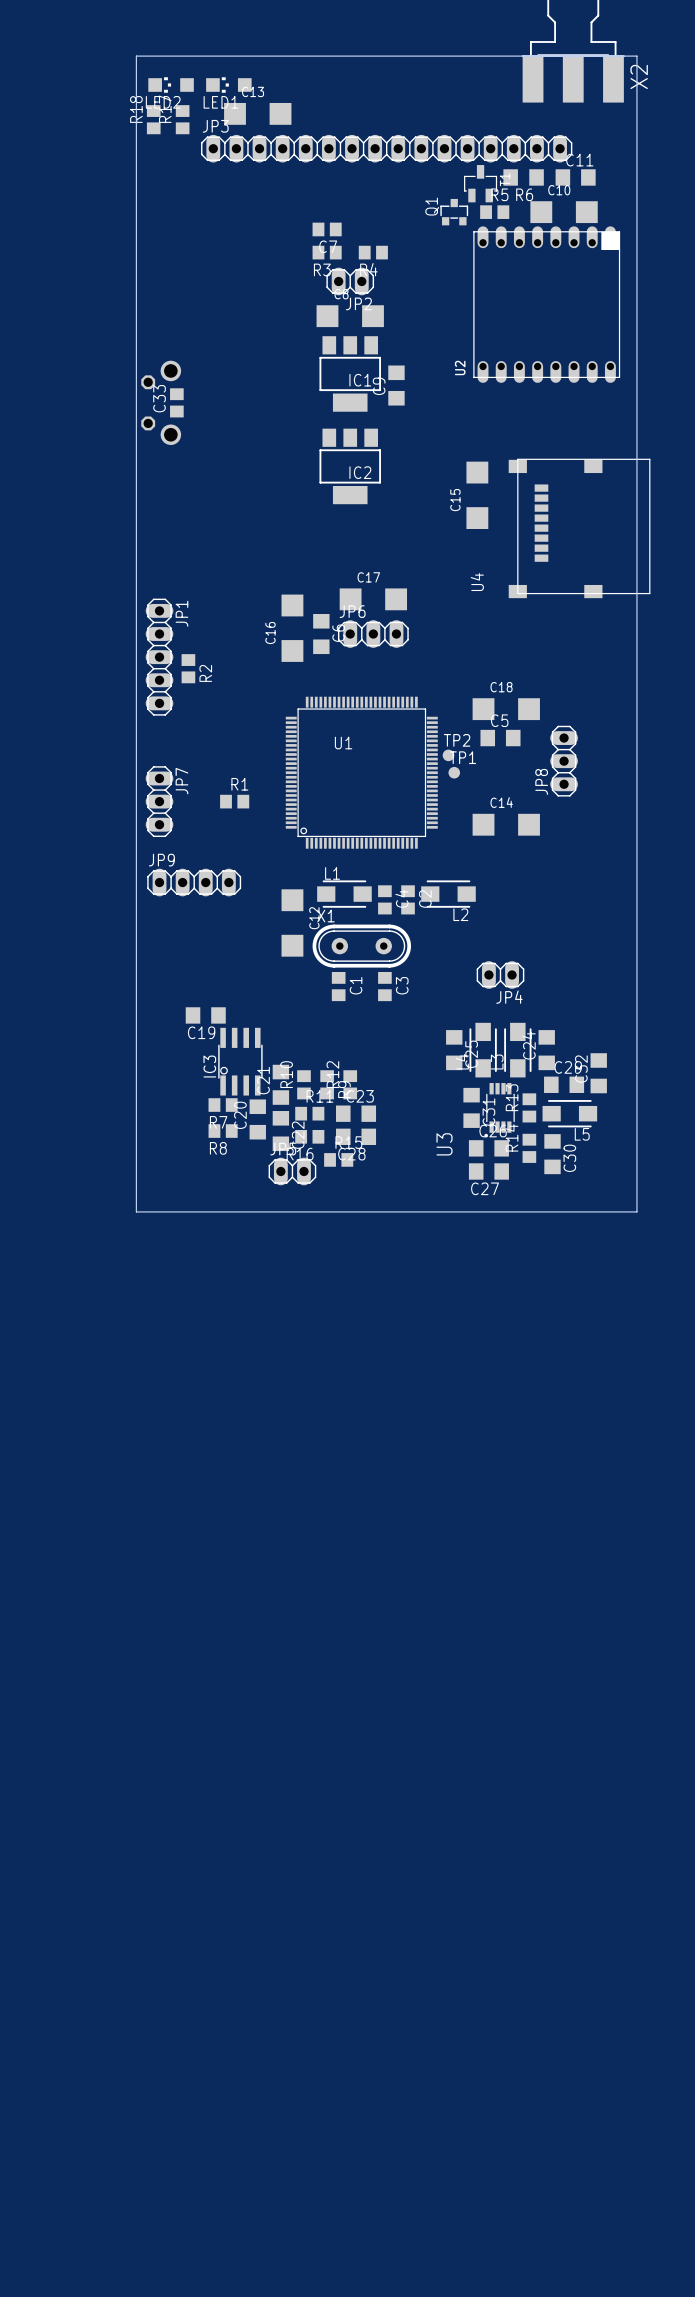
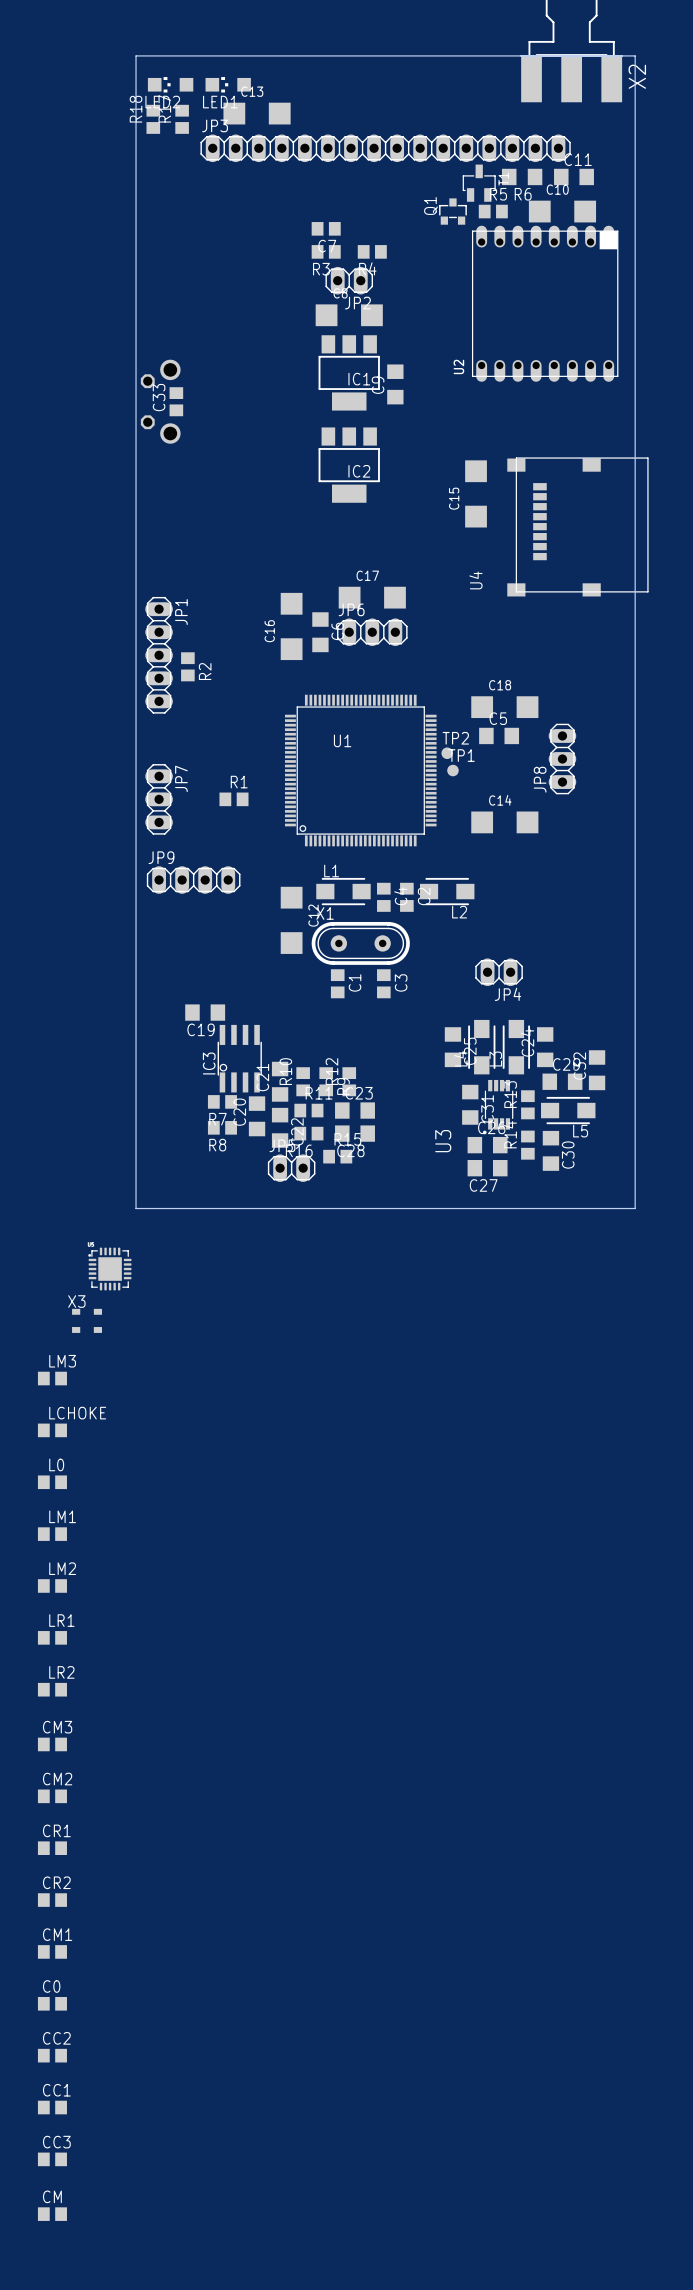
part: none -> (109, 1269)
X3: none -> (87, 1320)
LM3: none -> (52, 1378)
LCHOKE: none -> (52, 1430)
L0: none -> (52, 1482)
LM1: none -> (52, 1534)
LM2: none -> (52, 1585)
LR1: none -> (52, 1637)
LR2: none -> (52, 1689)
CM3: none -> (52, 1744)
CM2: none -> (52, 1796)
CR1: none -> (52, 1848)
CR2: none -> (52, 1900)
CM1: none -> (52, 1951)
C0: none -> (52, 2003)
CC2: none -> (52, 2055)
CC1: none -> (52, 2107)
CC3: none -> (52, 2159)
CM: none -> (52, 2214)

